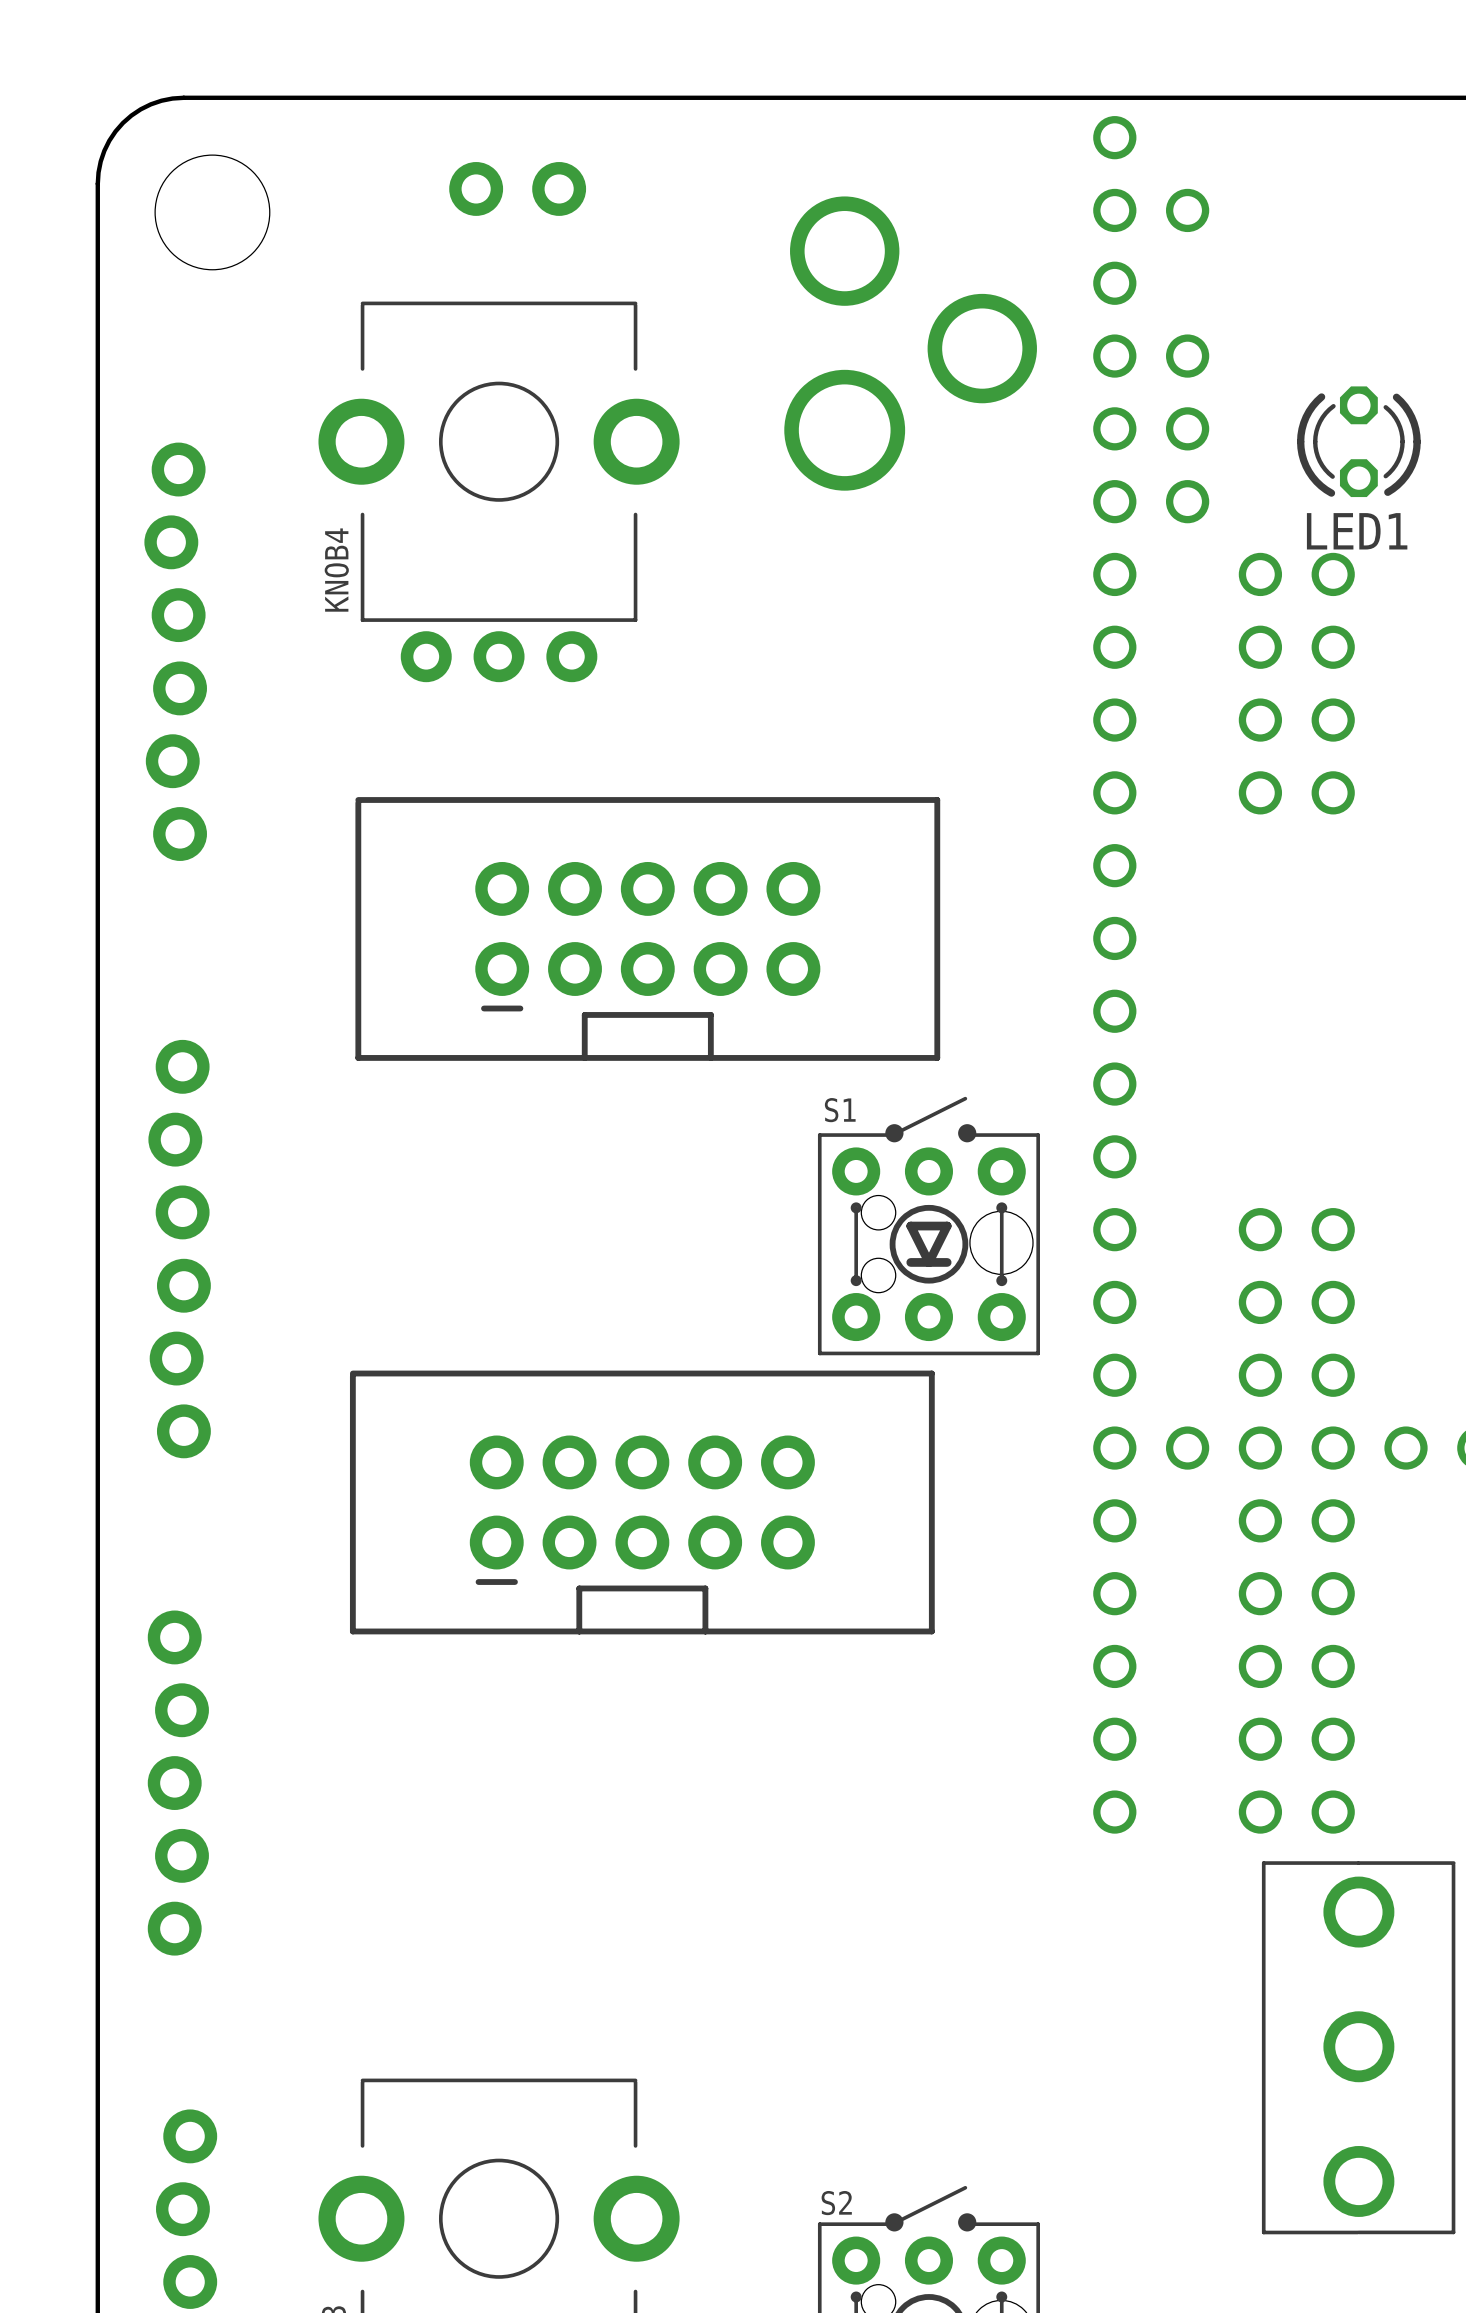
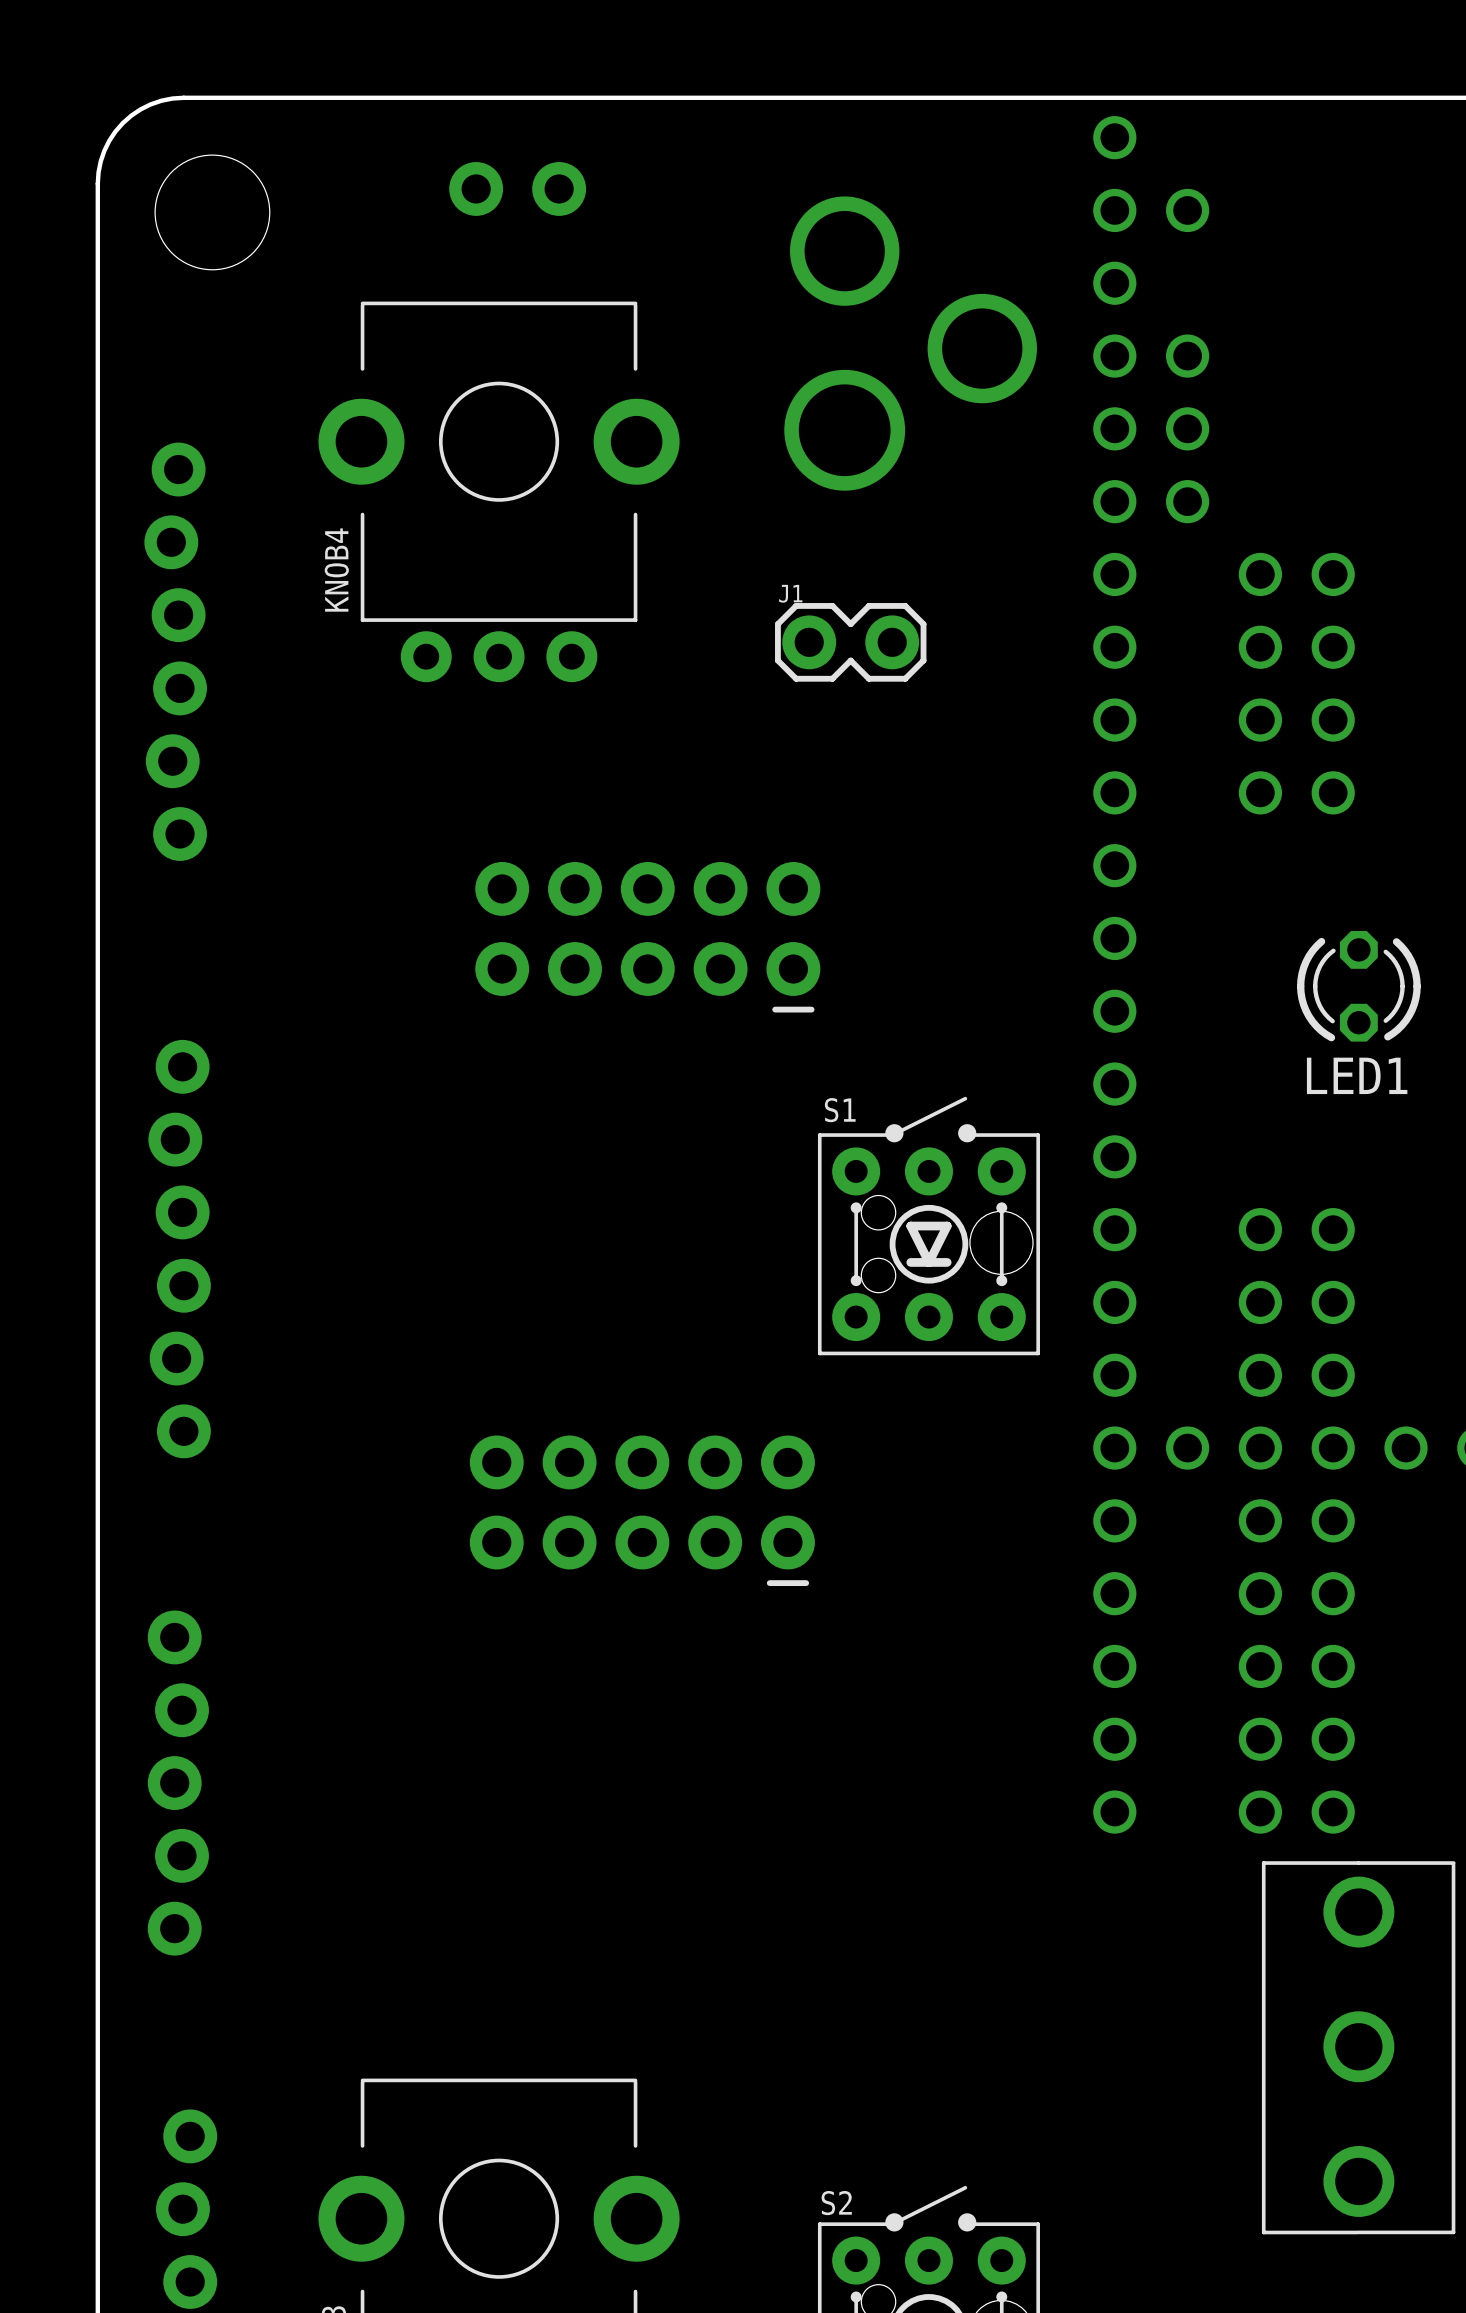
LED1 position: (1358, 441) -> (1358, 986)
J1: none -> (850, 642)
part side: top (647, 928) -> bottom (647, 937)
part side: top (642, 1502) -> bottom (642, 1510)

